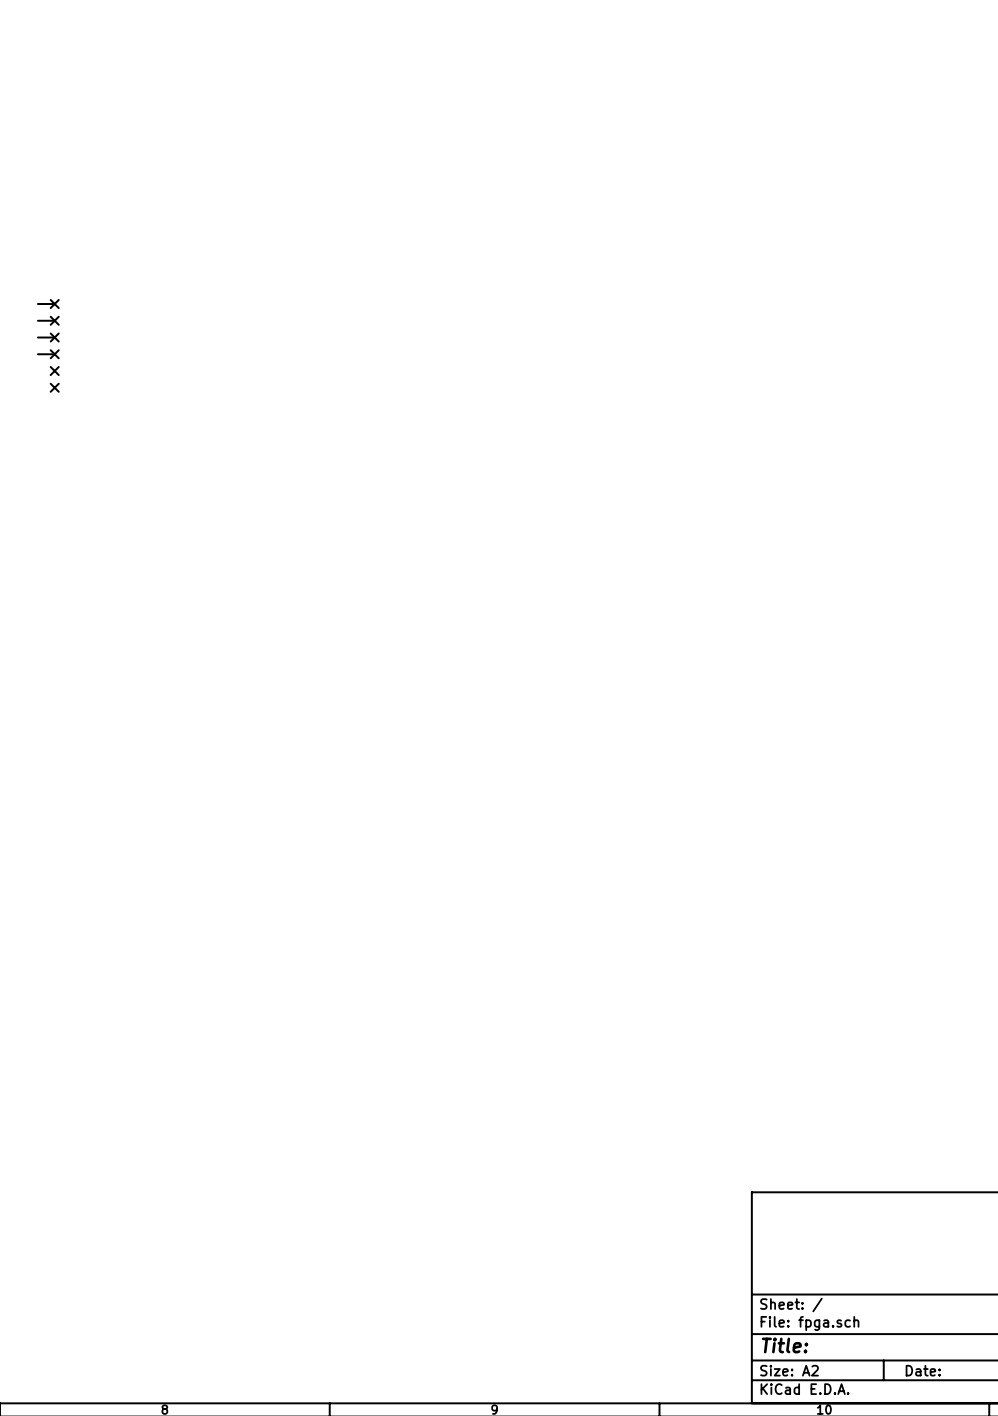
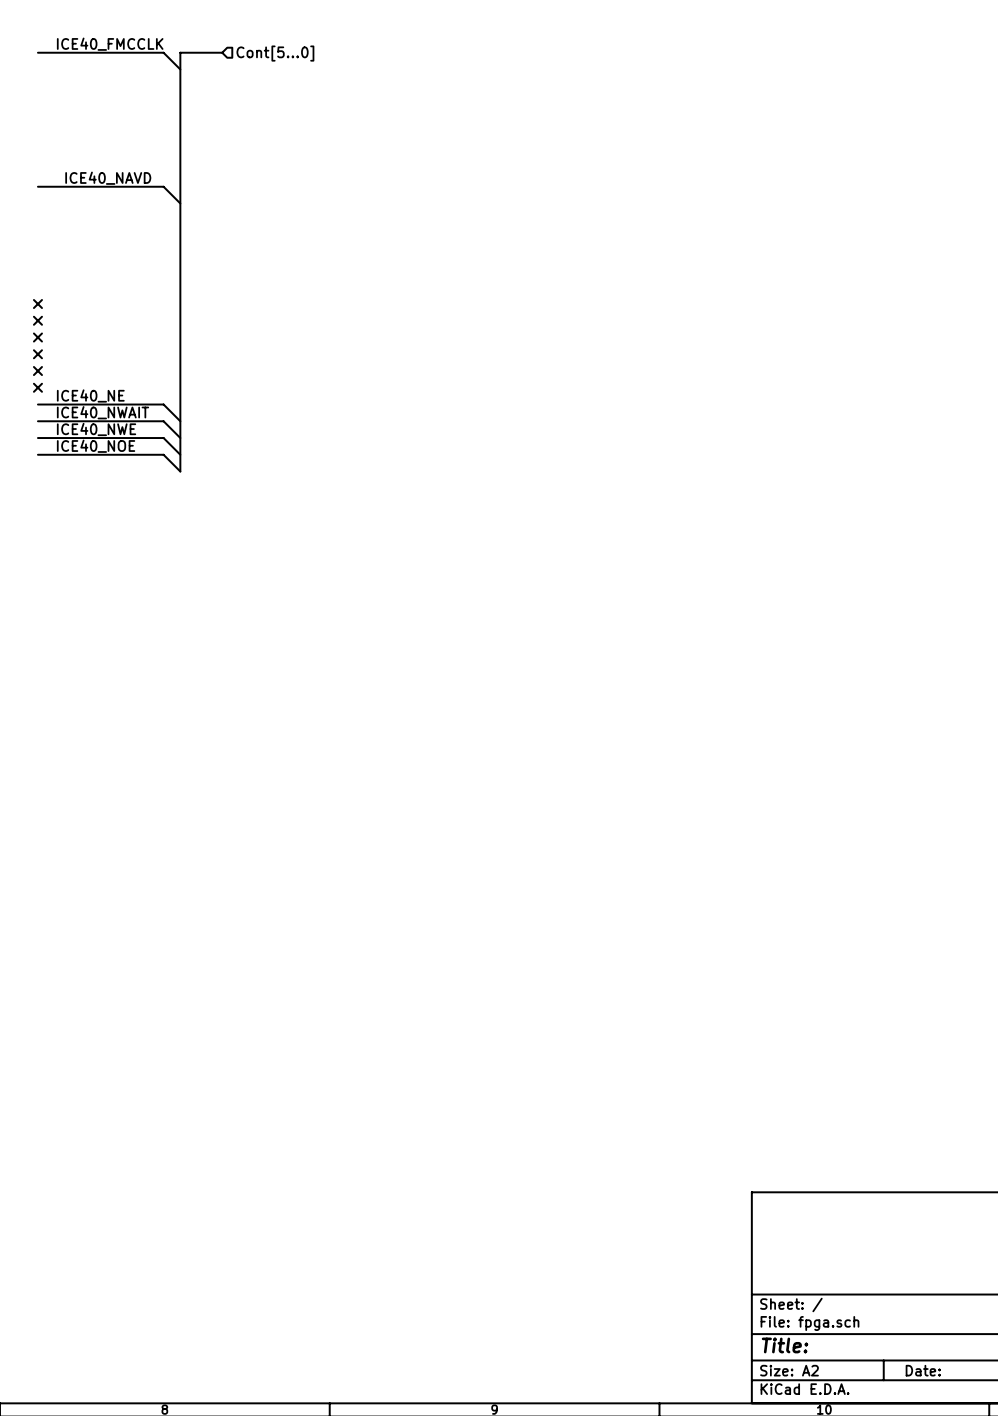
label: none -> ICE40_FMCCLK (110, 44)
wire: none -> (37, 52) (163, 52) (180, 69)
bus: none -> (222, 52) (180, 52) (180, 471)
hierarchical label: none -> Cont[5...0] (275, 53)
label: none -> ICE40_NAVD (108, 178)
wire: none -> (37, 186) (163, 186) (180, 203)
wire: (37, 304) (54, 304) -> none
no-connect mark: none -> (37, 304)
no-connect mark: (54, 304) -> none
wire: (37, 320) (54, 320) -> none
no-connect mark: none -> (37, 320)
no-connect mark: (54, 320) -> none
wire: (37, 337) (54, 337) -> none
no-connect mark: none -> (37, 337)
no-connect mark: (54, 337) -> none
wire: (37, 354) (54, 354) -> none
no-connect mark: none -> (37, 354)
no-connect mark: (54, 354) -> none
no-connect mark: none -> (37, 371)
no-connect mark: (54, 371) -> none
no-connect mark: none -> (37, 387)
no-connect mark: (54, 387) -> none
label: none -> ICE40_NE (90, 395)
wire: none -> (37, 404) (163, 404) (180, 421)
label: none -> ICE40_NWAIT (102, 412)
wire: none -> (37, 421) (163, 421) (180, 438)
label: none -> ICE40_NWE (96, 429)
wire: none -> (37, 438) (163, 438) (180, 454)
label: none -> ICE40_NOE (96, 446)
wire: none -> (37, 454) (163, 454) (180, 471)

